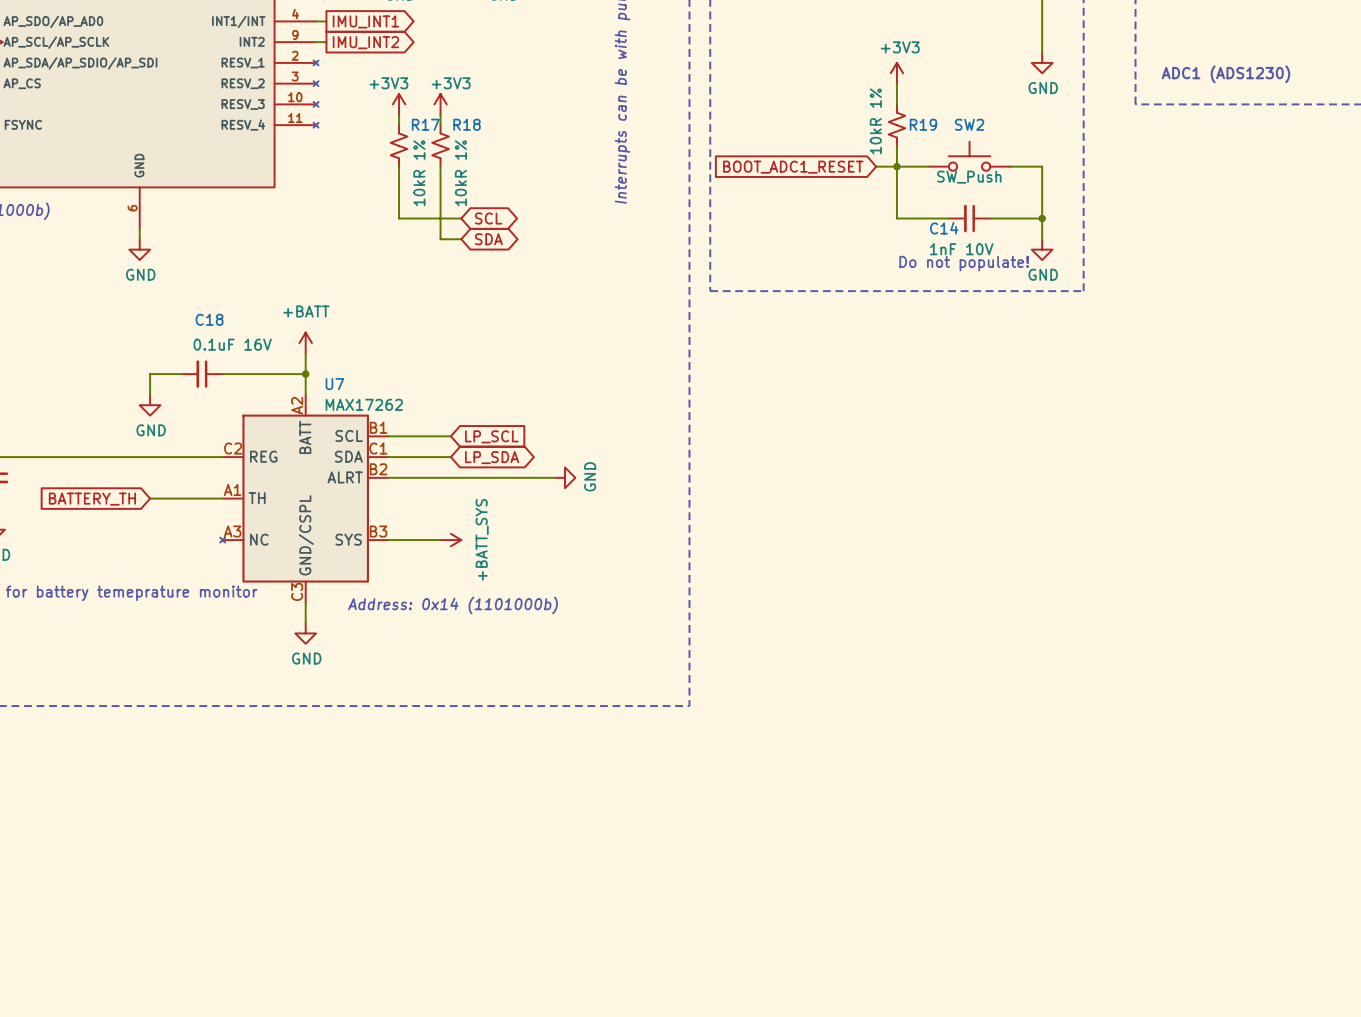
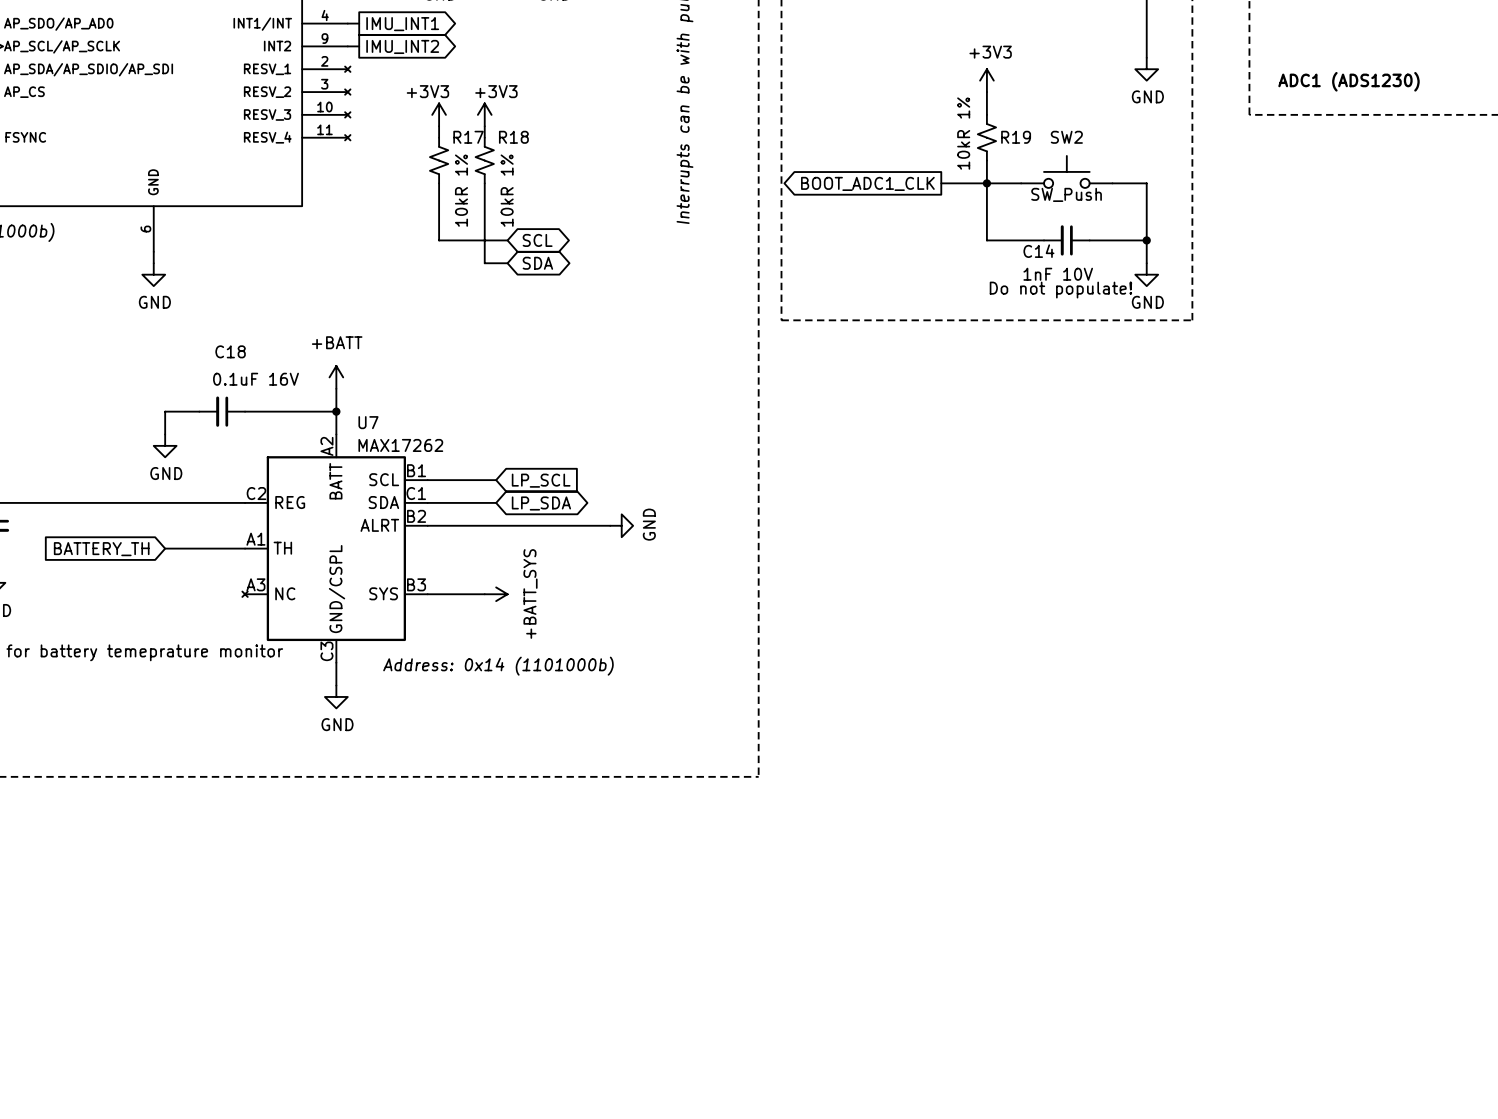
wire: none -> (941, 183) (964, 183)
global label shape: input (793, 167) -> output (867, 183)
global label: BOOT_ADC1_RESET (793, 167) -> BOOT_ADC1_CLK (867, 183)

